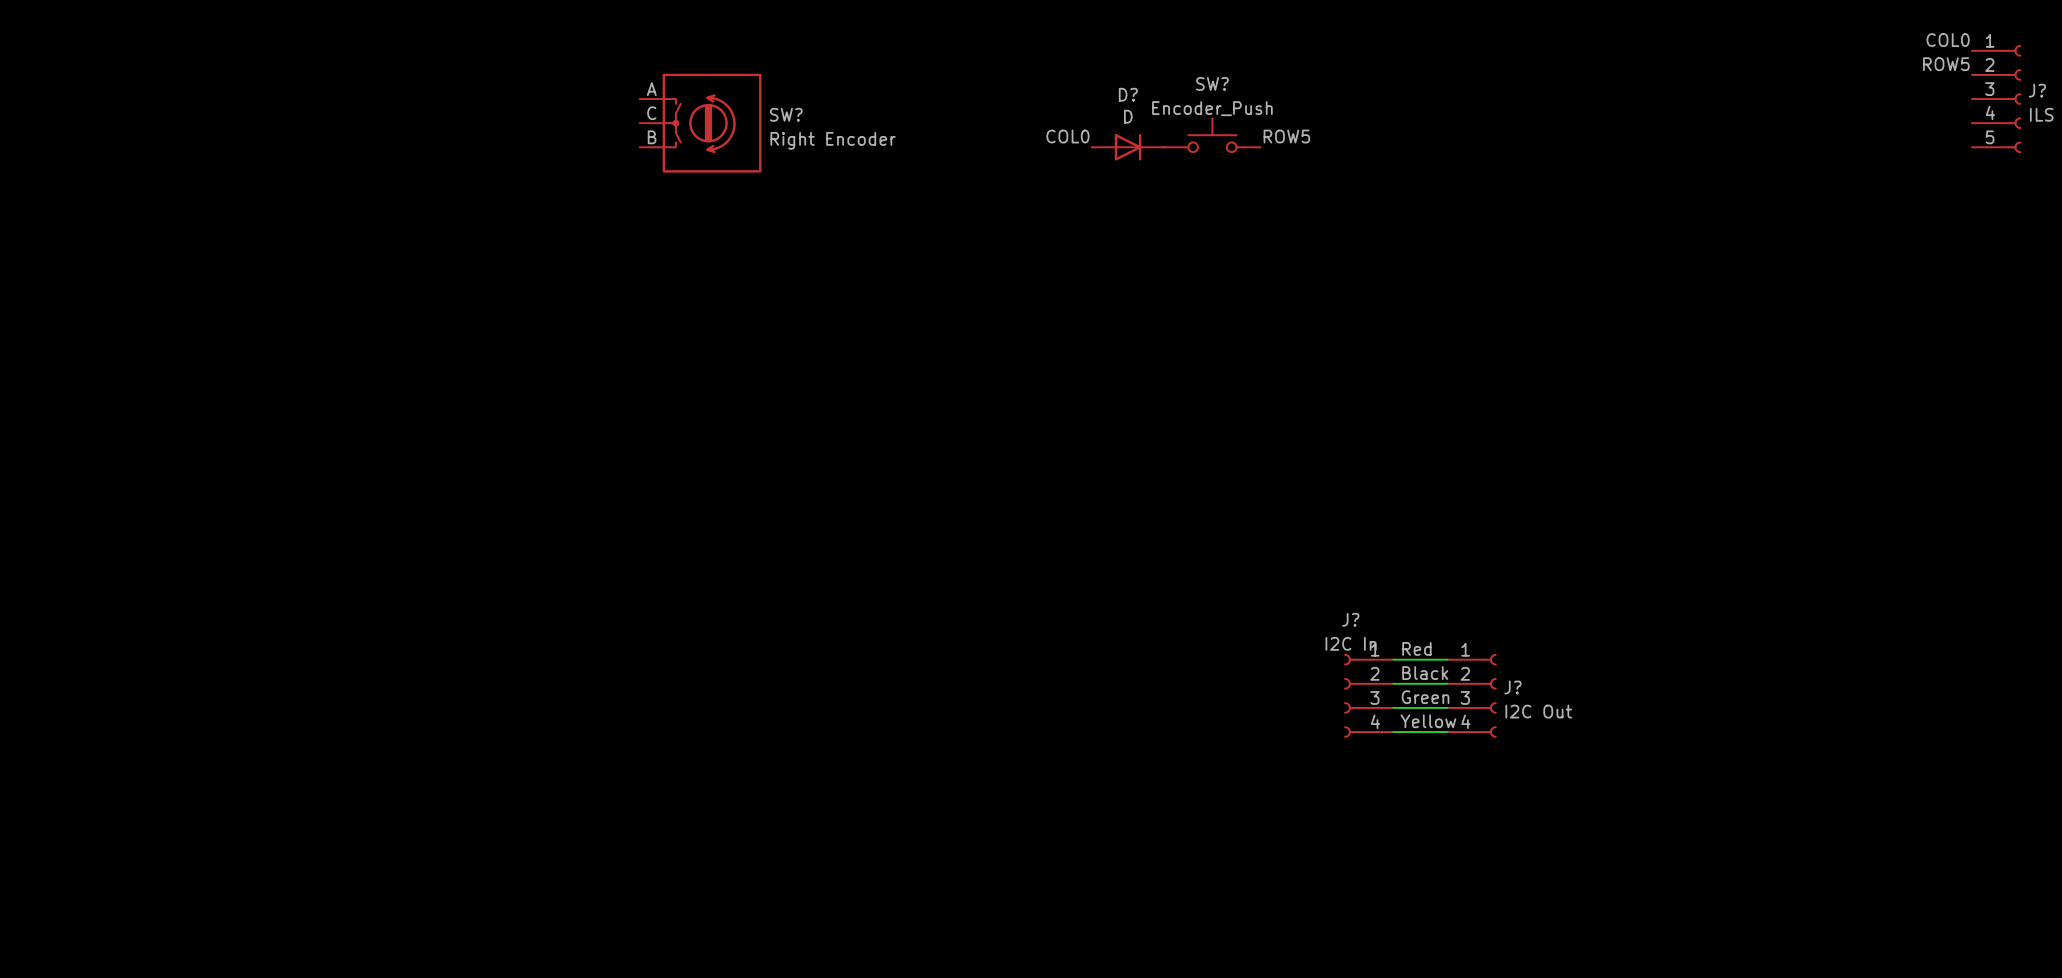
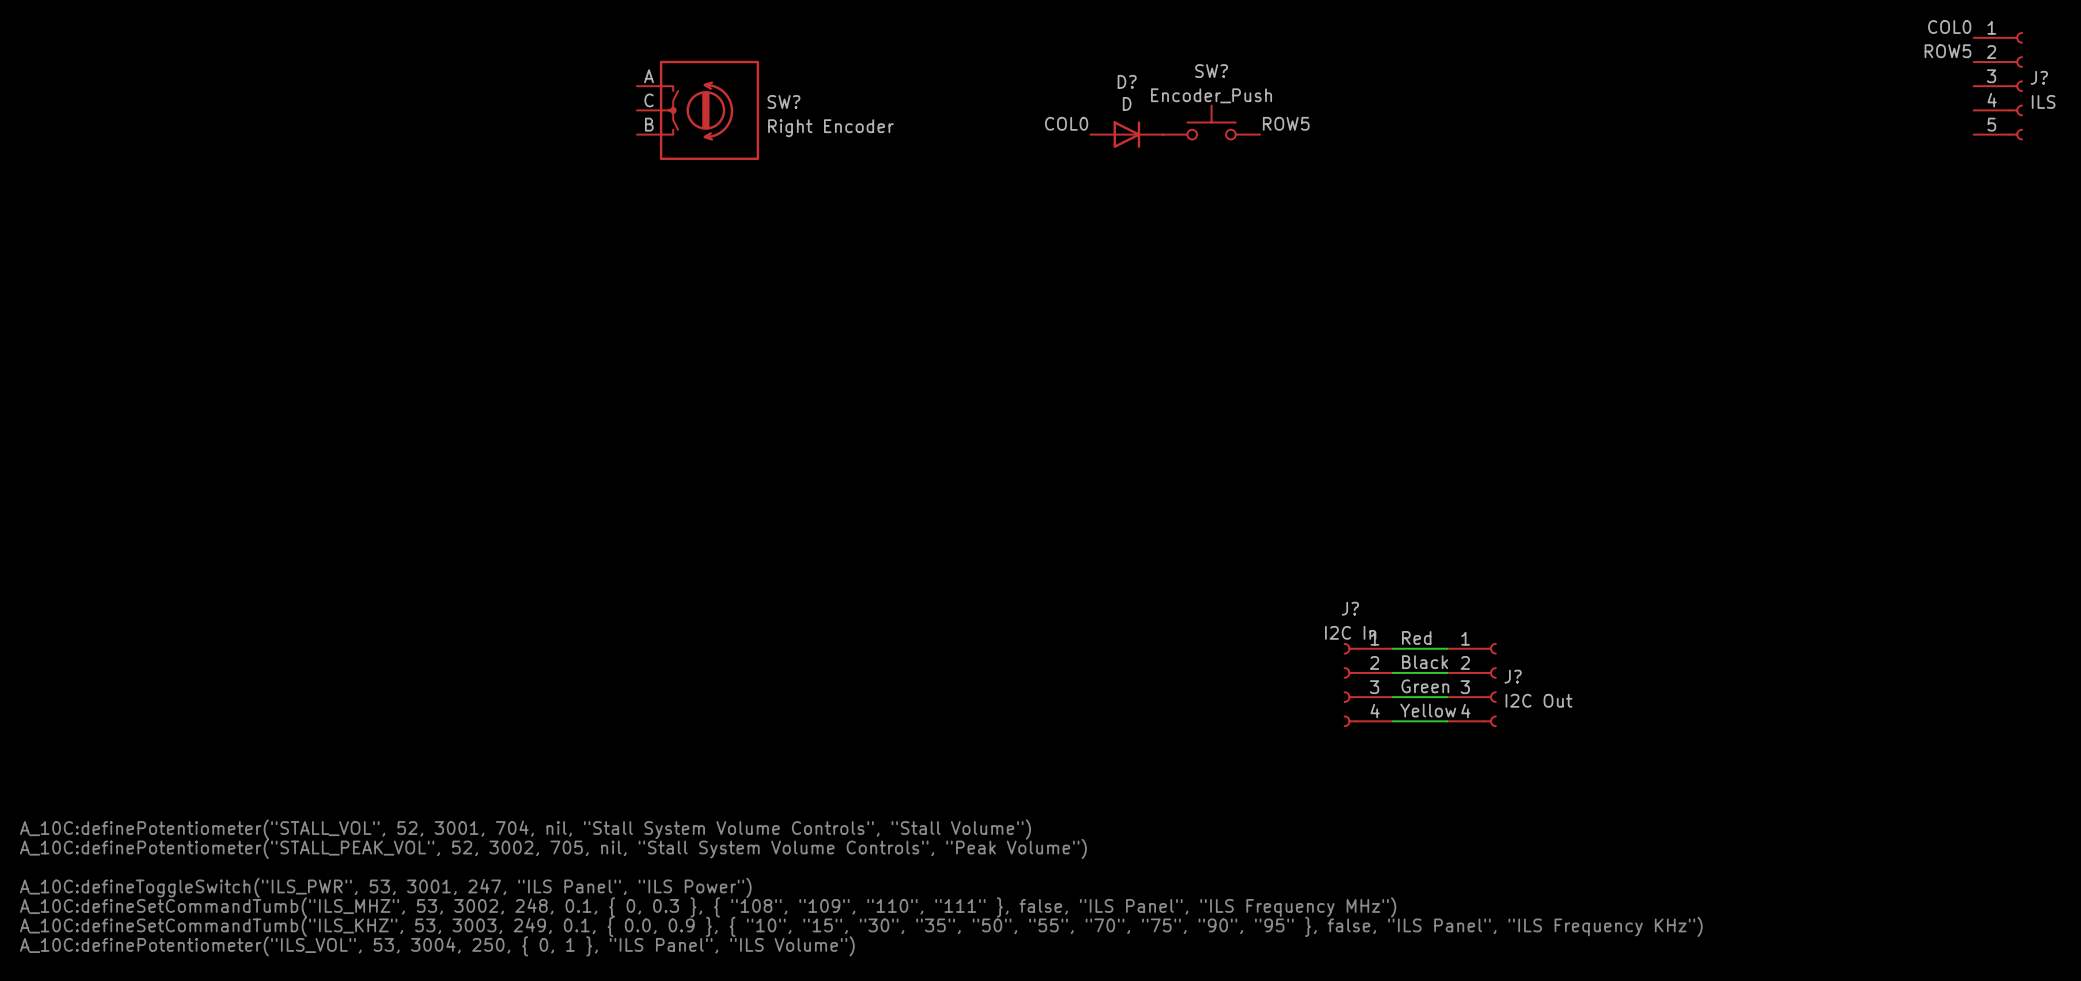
text: none -> A_10C:definePotentiometer("STALL_VOL", 52, 3001, 704, nil, "Stall System Volume Controls", "Stall Volume") (525, 829)
text: none -> A_10C:definePotentiometer("STALL_PEAK_VOL", 52, 3002, 705, nil, "Stall System Volume Controls", "Peak Volume") (553, 848)
text: none -> A_10C:defineToggleSwitch("ILS_PWR", 53, 3001, 247, "ILS Panel", "ILS Power") (385, 887)
text: none -> A_10C:defineSetCommandTumb("ILS_MHZ", 53, 3002, 248, 0.1, { 0, 0.3 }, { "108", "109", "110", "111" }, false, "ILS Panel", "ILS Frequency MHz") (708, 907)
text: none -> A_10C:defineSetCommandTumb("ILS_KHZ", 53, 3003, 249, 0.1, { 0.0, 0.9 }, { "10", "15", "30", "35", "50", "55", "70", "75", "90", "95" }, false, "ILS Panel", "ILS Frequency KHz") (861, 926)
text: none -> A_10C:definePotentiometer("ILS_VOL", 53, 3004, 250, { 0, 1 }, "ILS Panel", "ILS Volume") (437, 946)

